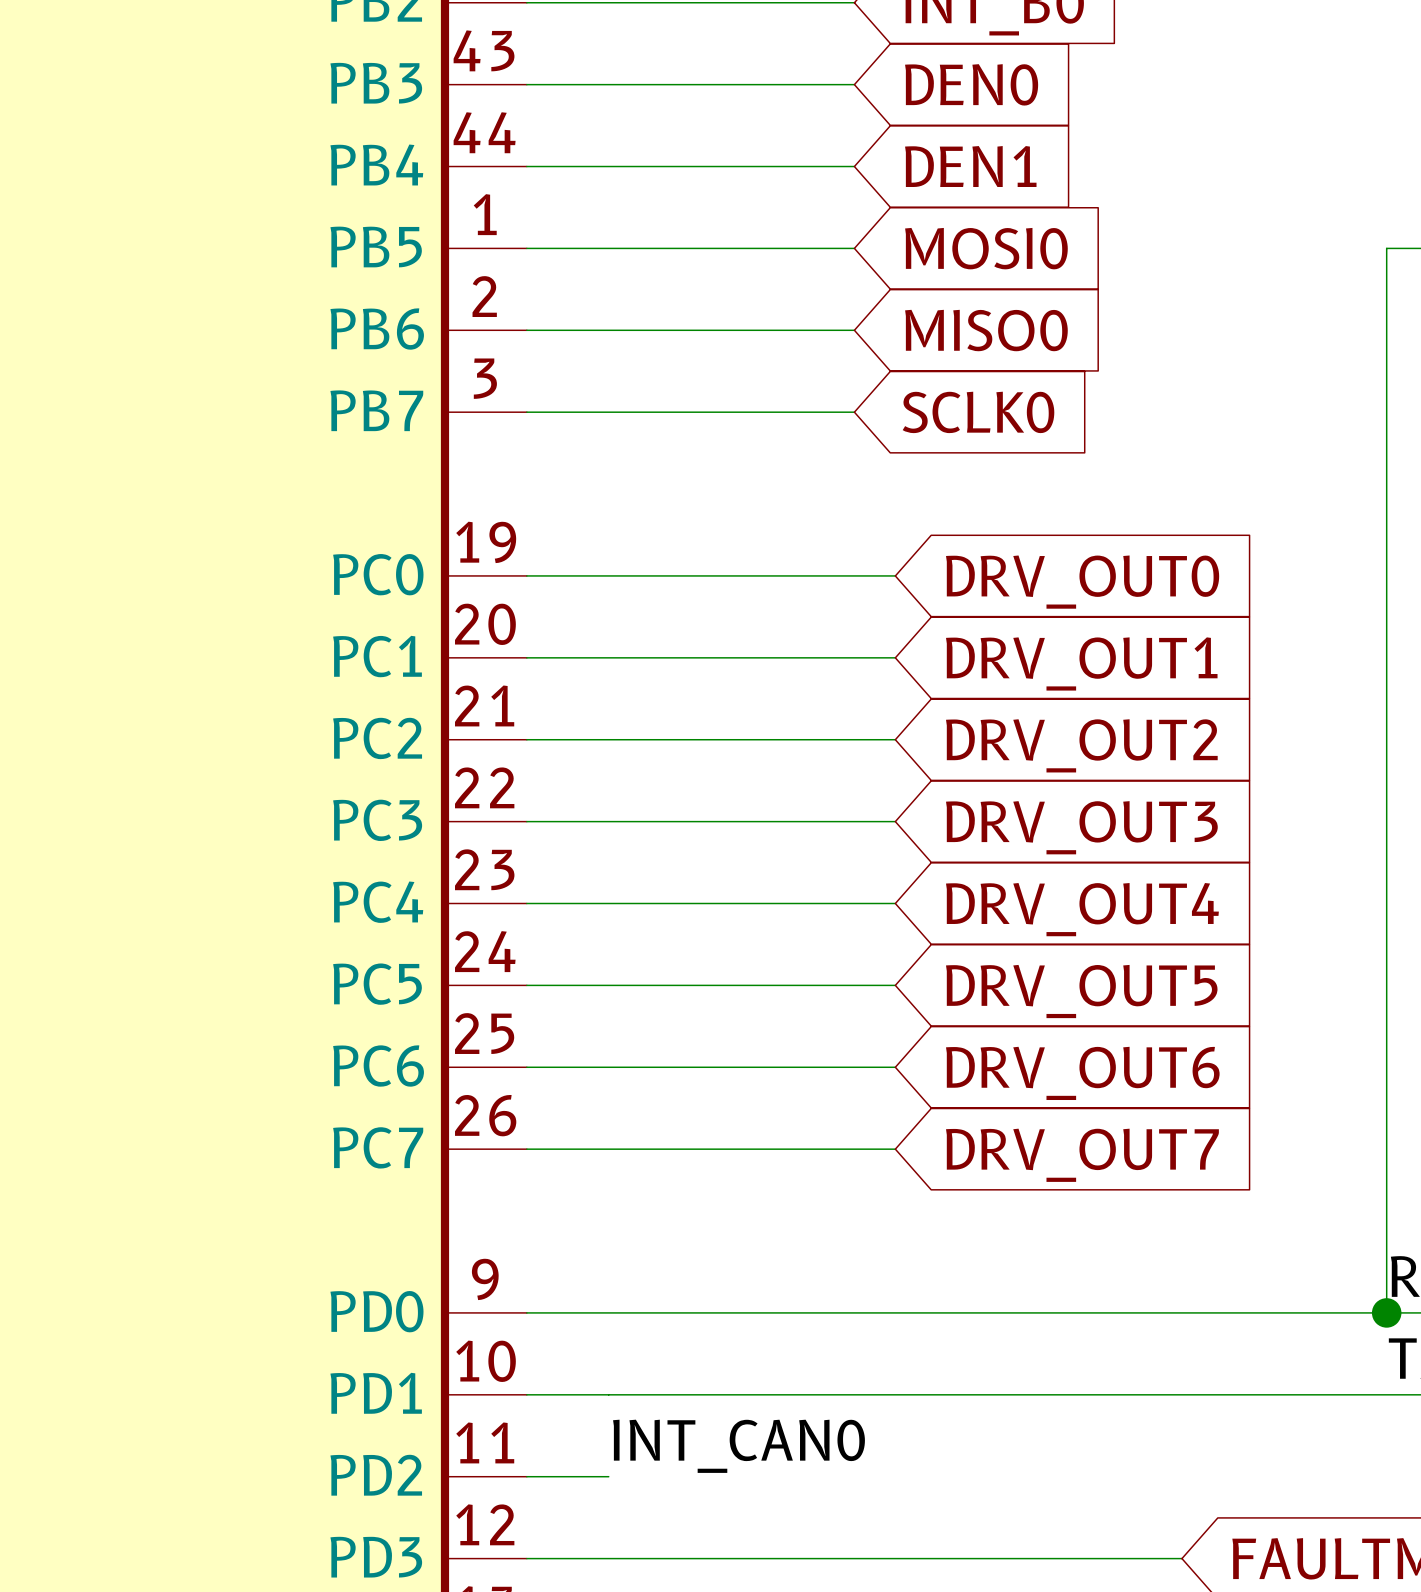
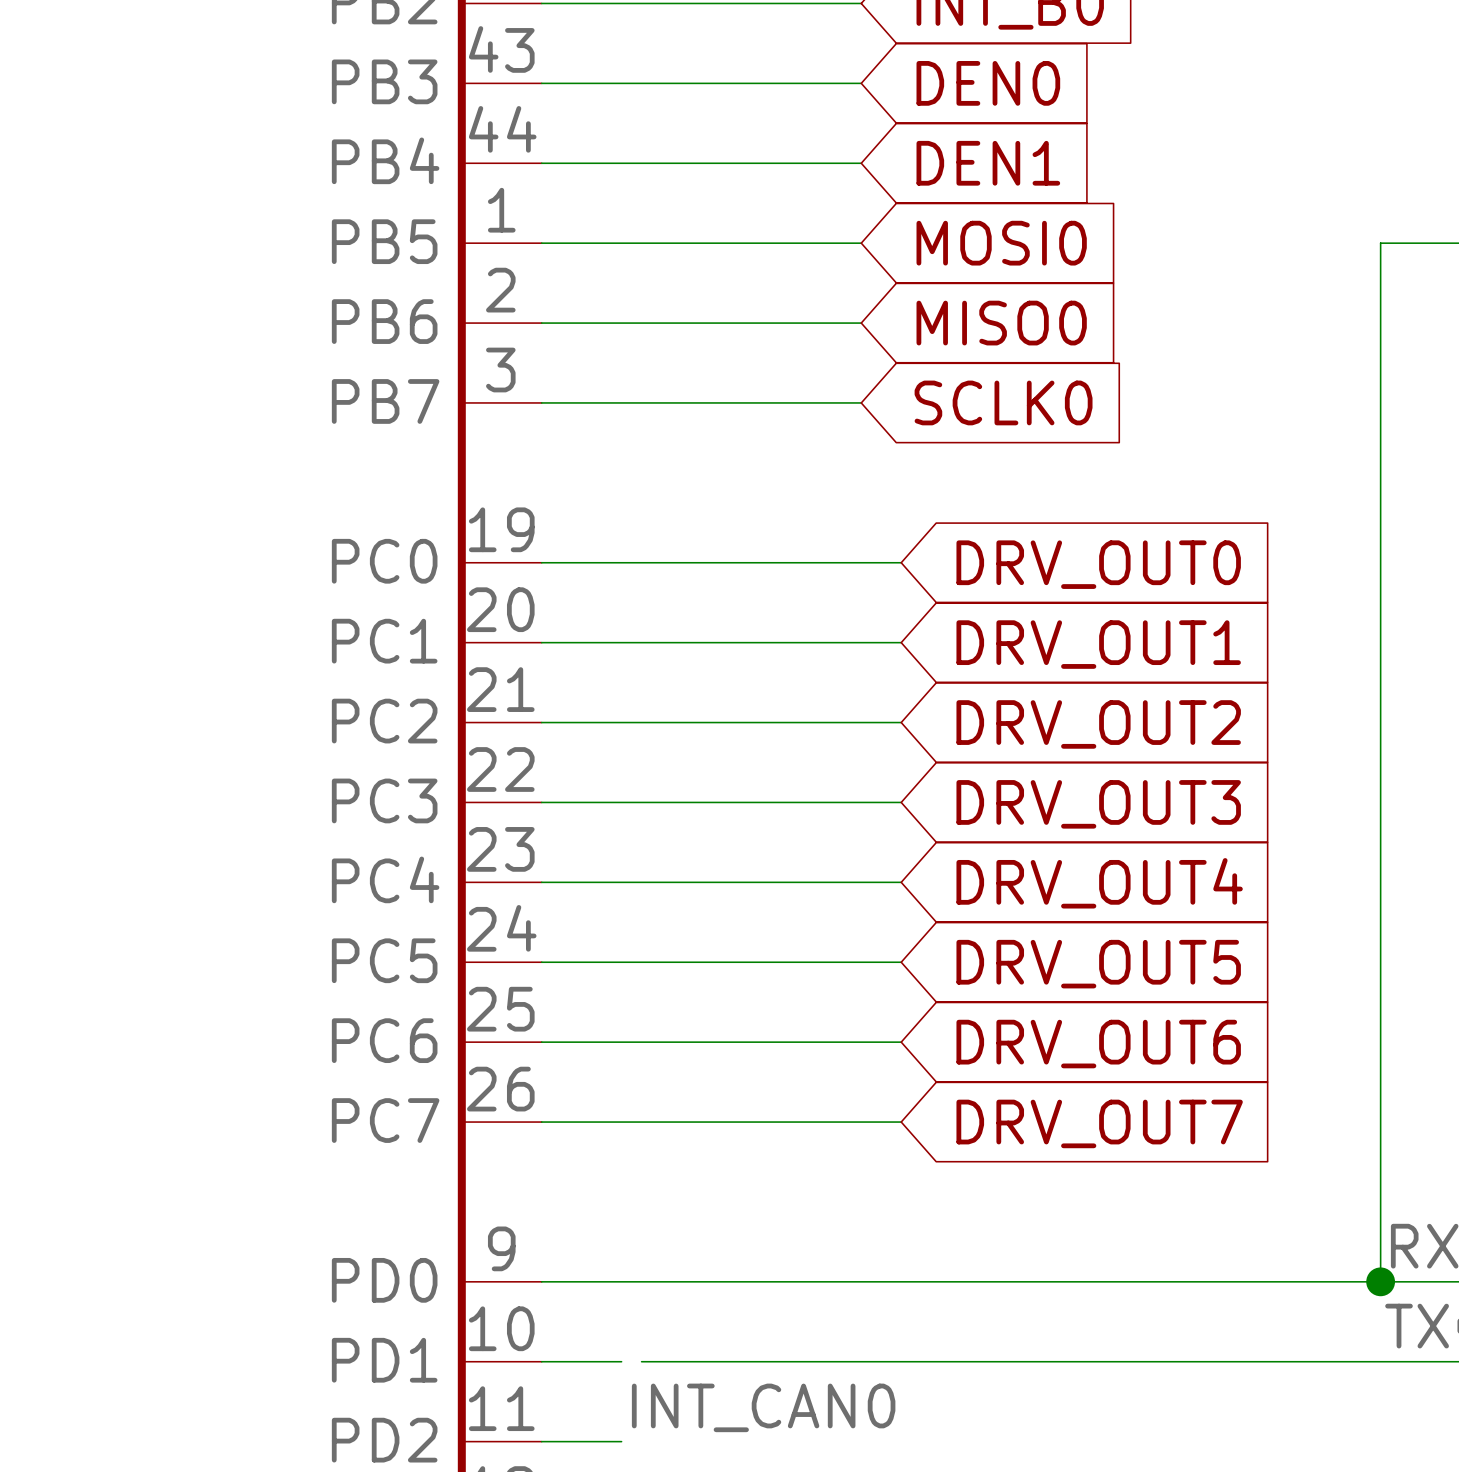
wire: (608, 1394) (629, 1394) -> none

